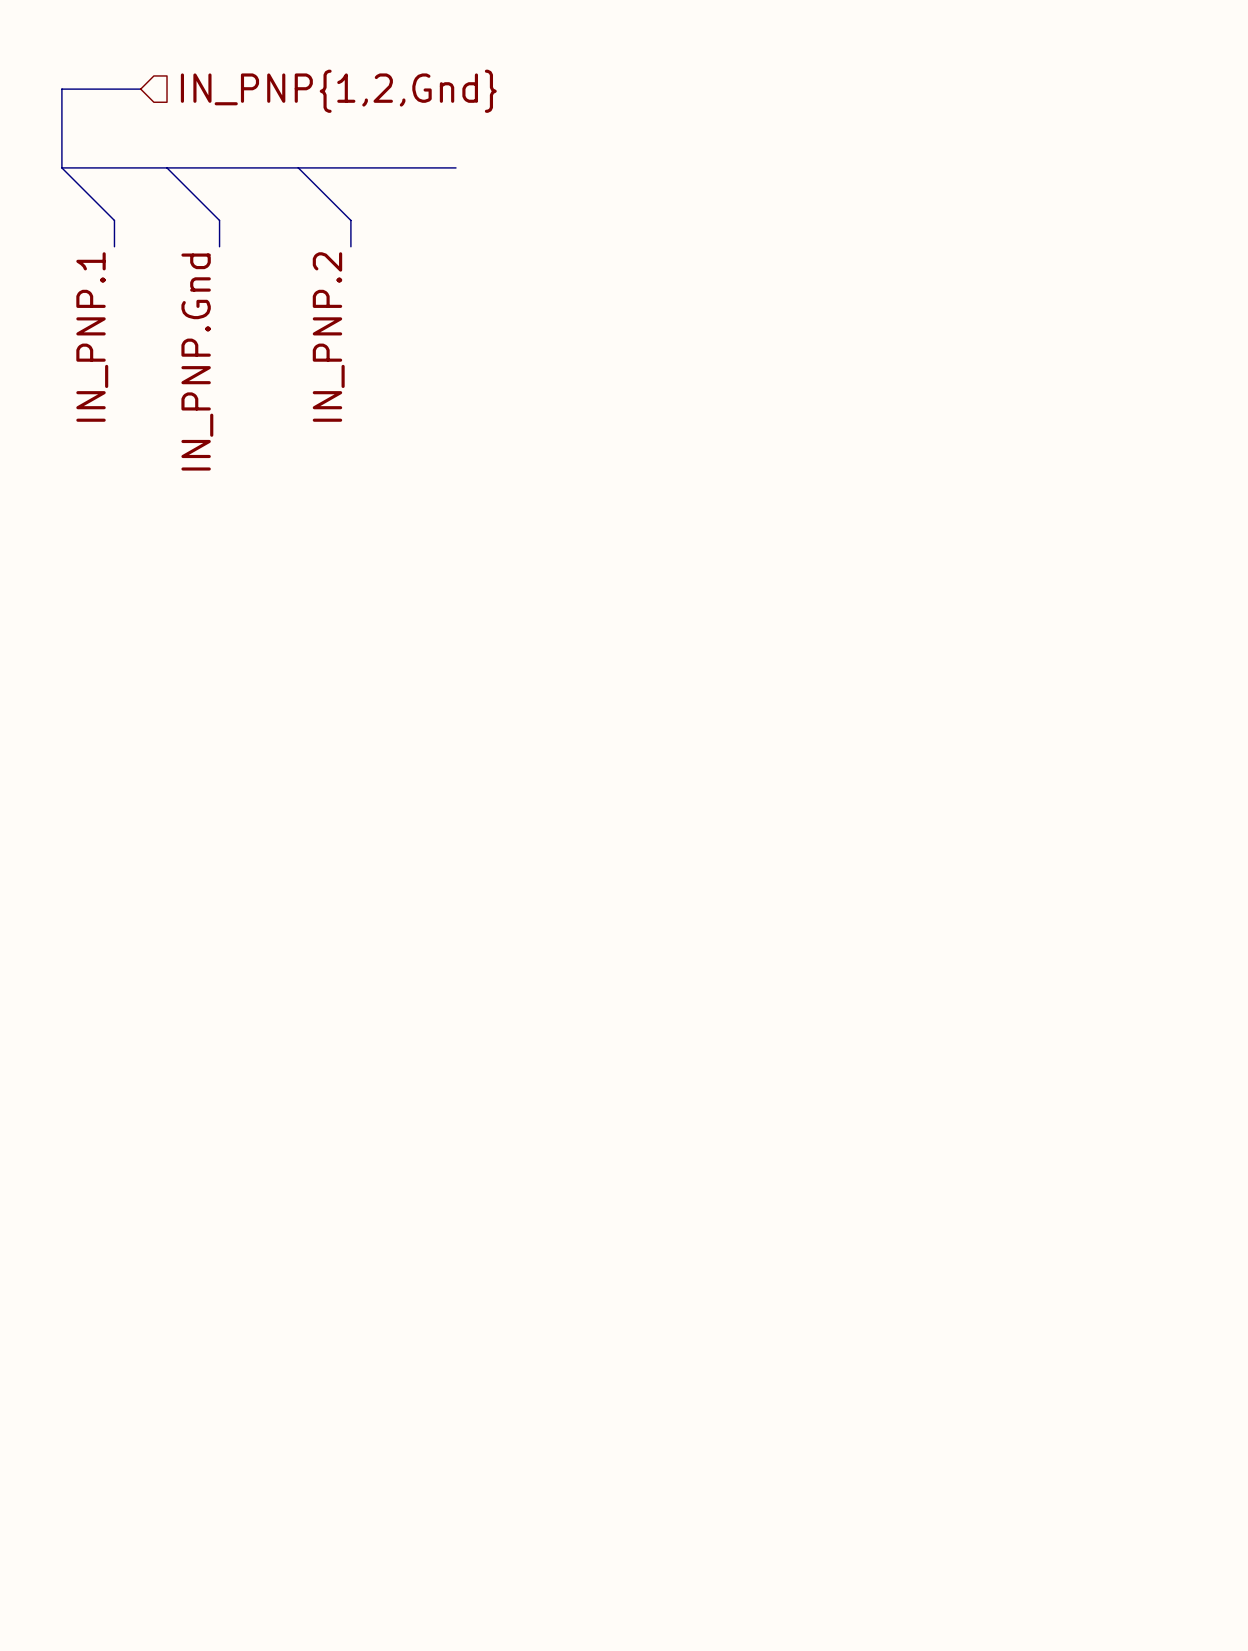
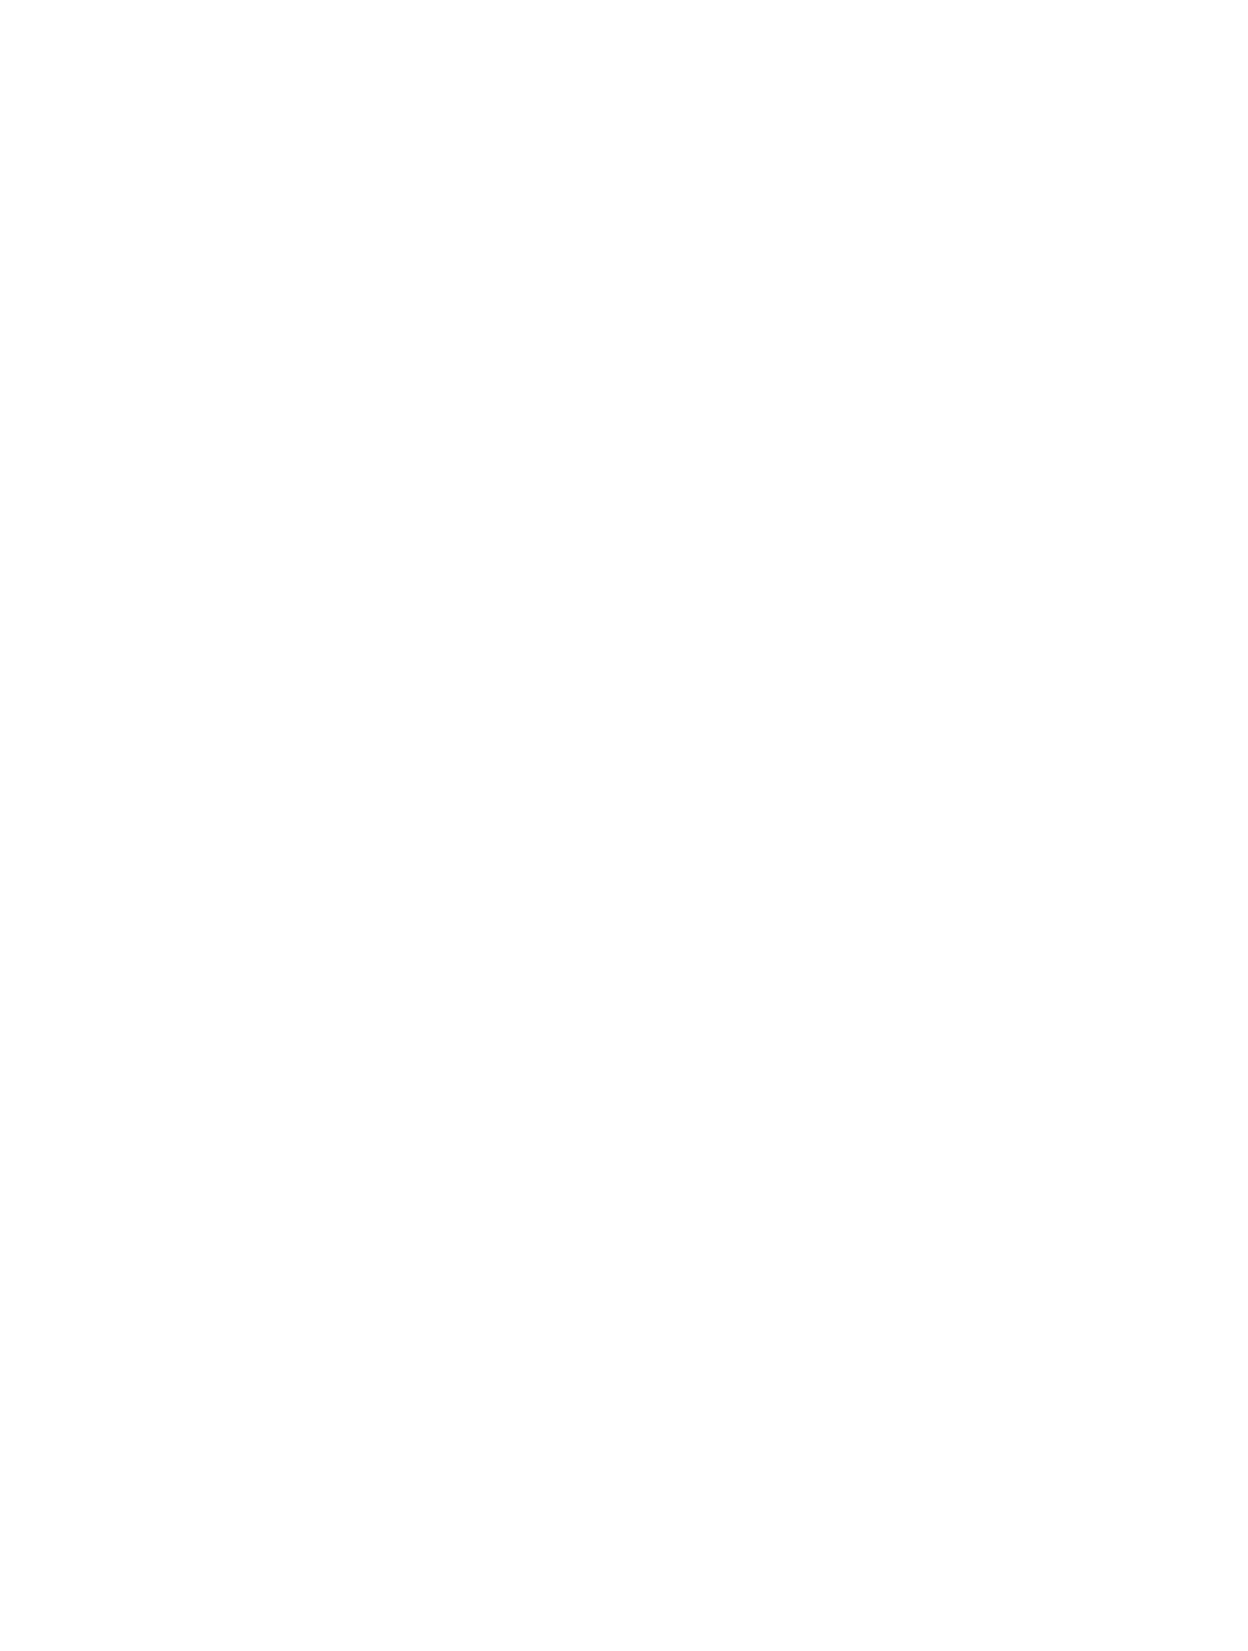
bus: (140, 89) (61, 89) (61, 167) (456, 167) -> none
hierarchical label: IN_PNP{1,2,Gnd} (338, 91) -> none
wire: (61, 167) (114, 220) (114, 246) -> none
wire: (167, 167) (219, 220) (219, 246) -> none
wire: (298, 167) (350, 220) (350, 246) -> none
label: IN_PNP.1 (92, 337) -> none
label: IN_PNP.2 (328, 337) -> none
label: IN_PNP.Gnd (197, 362) -> none

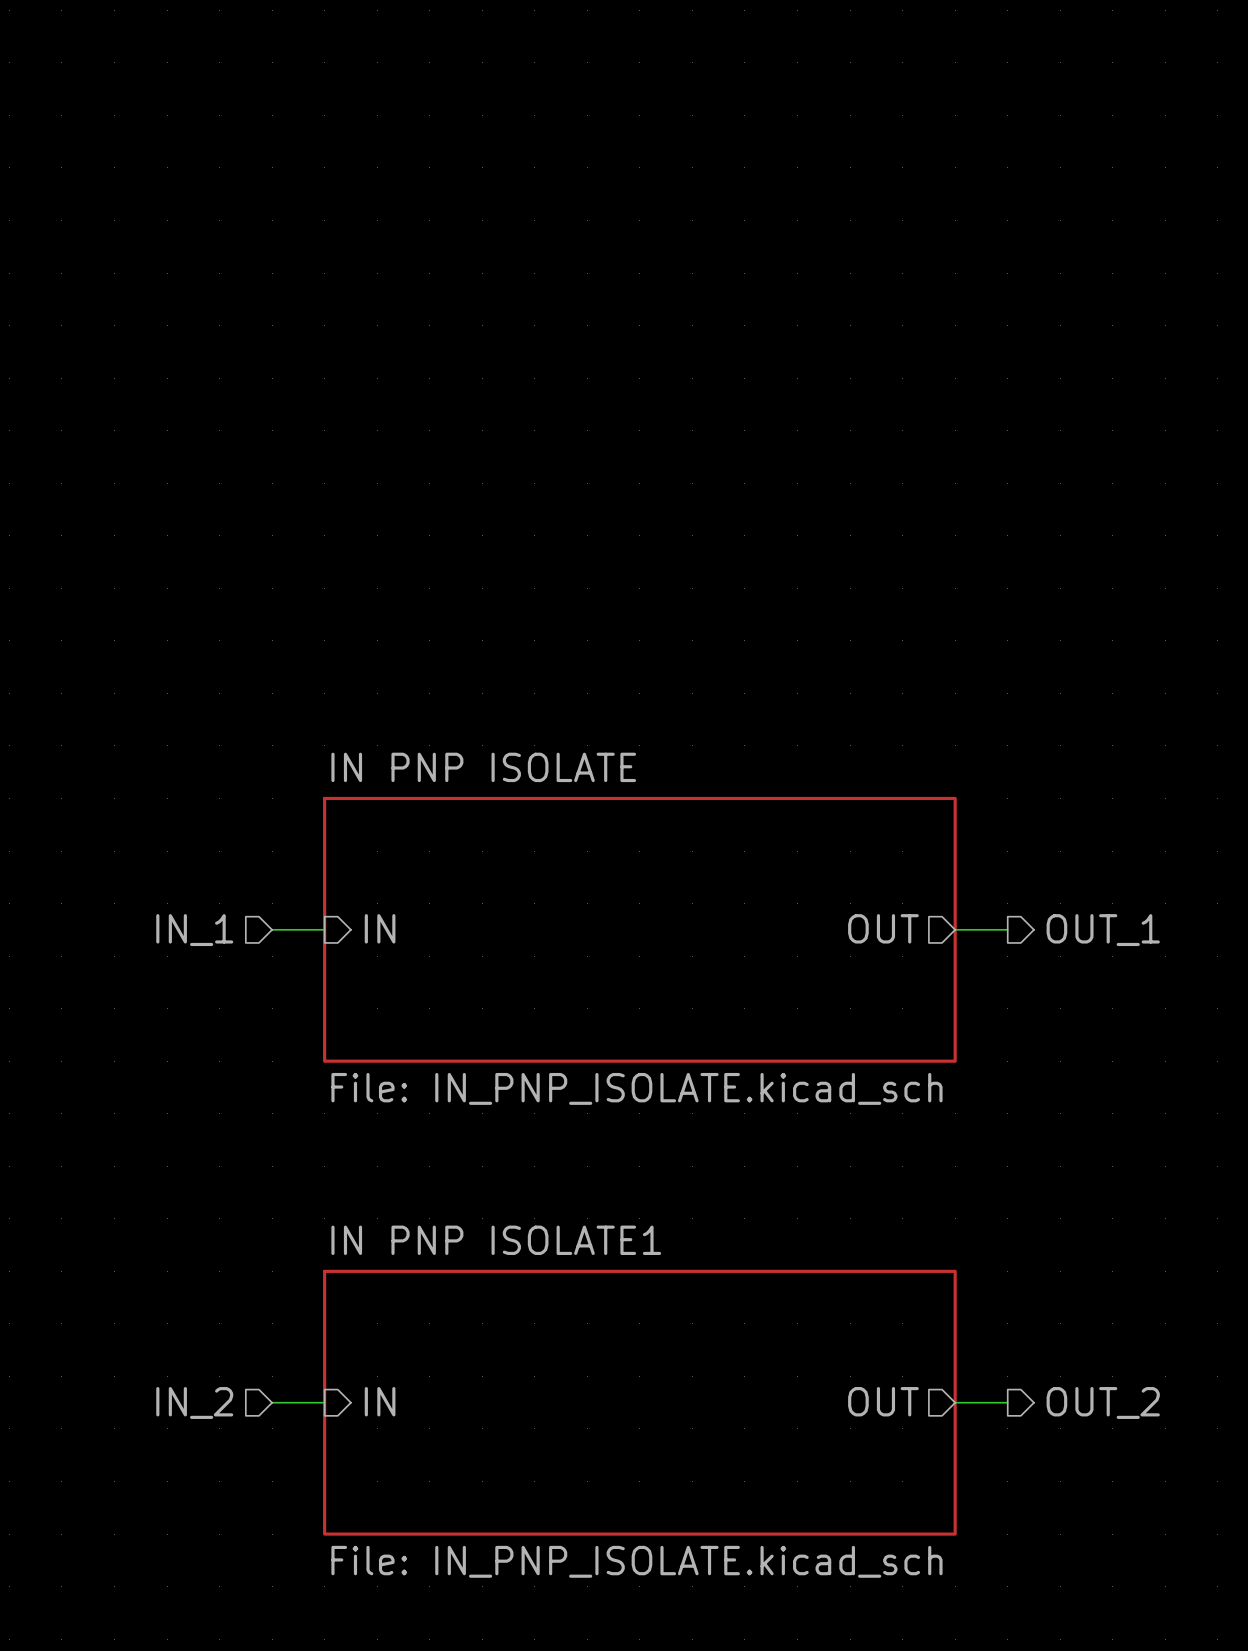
sheet pin: none -> IN (380, 928)
sheet pin: none -> OUT (883, 928)
wire: none -> (272, 929) (324, 929)
sheet IN PNP ISOLATE: none -> File: IN_PNP_ISOLATE.kicad_sch (639, 929)
wire: none -> (955, 929) (1007, 929)
hierarchical label: none -> IN_1 (194, 930)
hierarchical label: none -> OUT_1 (1103, 930)
sheet pin: none -> IN (380, 1401)
sheet pin: none -> OUT (883, 1401)
hierarchical label: none -> IN_2 (194, 1402)
wire: none -> (272, 1402) (324, 1402)
sheet IN PNP ISOLATE1: none -> File: IN_PNP_ISOLATE.kicad_sch (639, 1402)
wire: none -> (955, 1402) (1007, 1402)
hierarchical label: none -> OUT_2 (1103, 1402)

